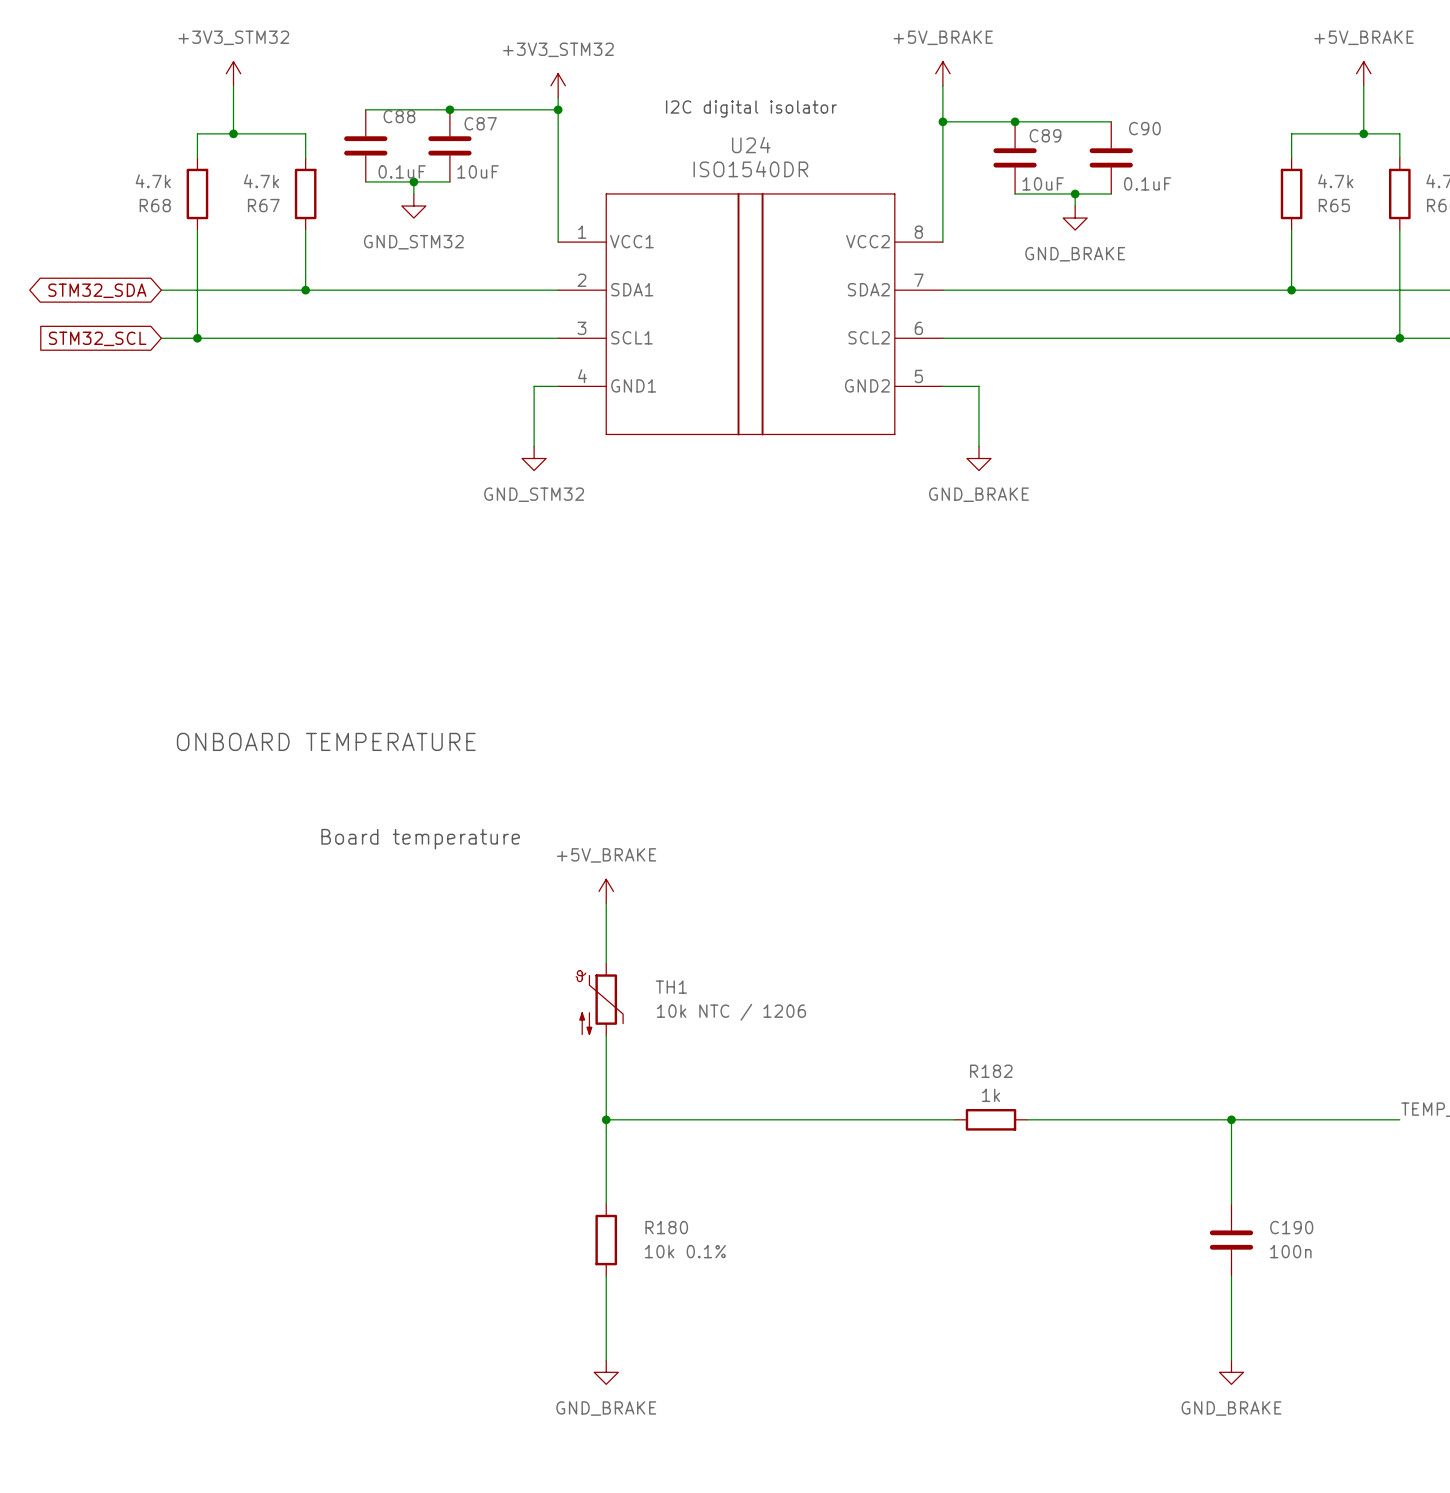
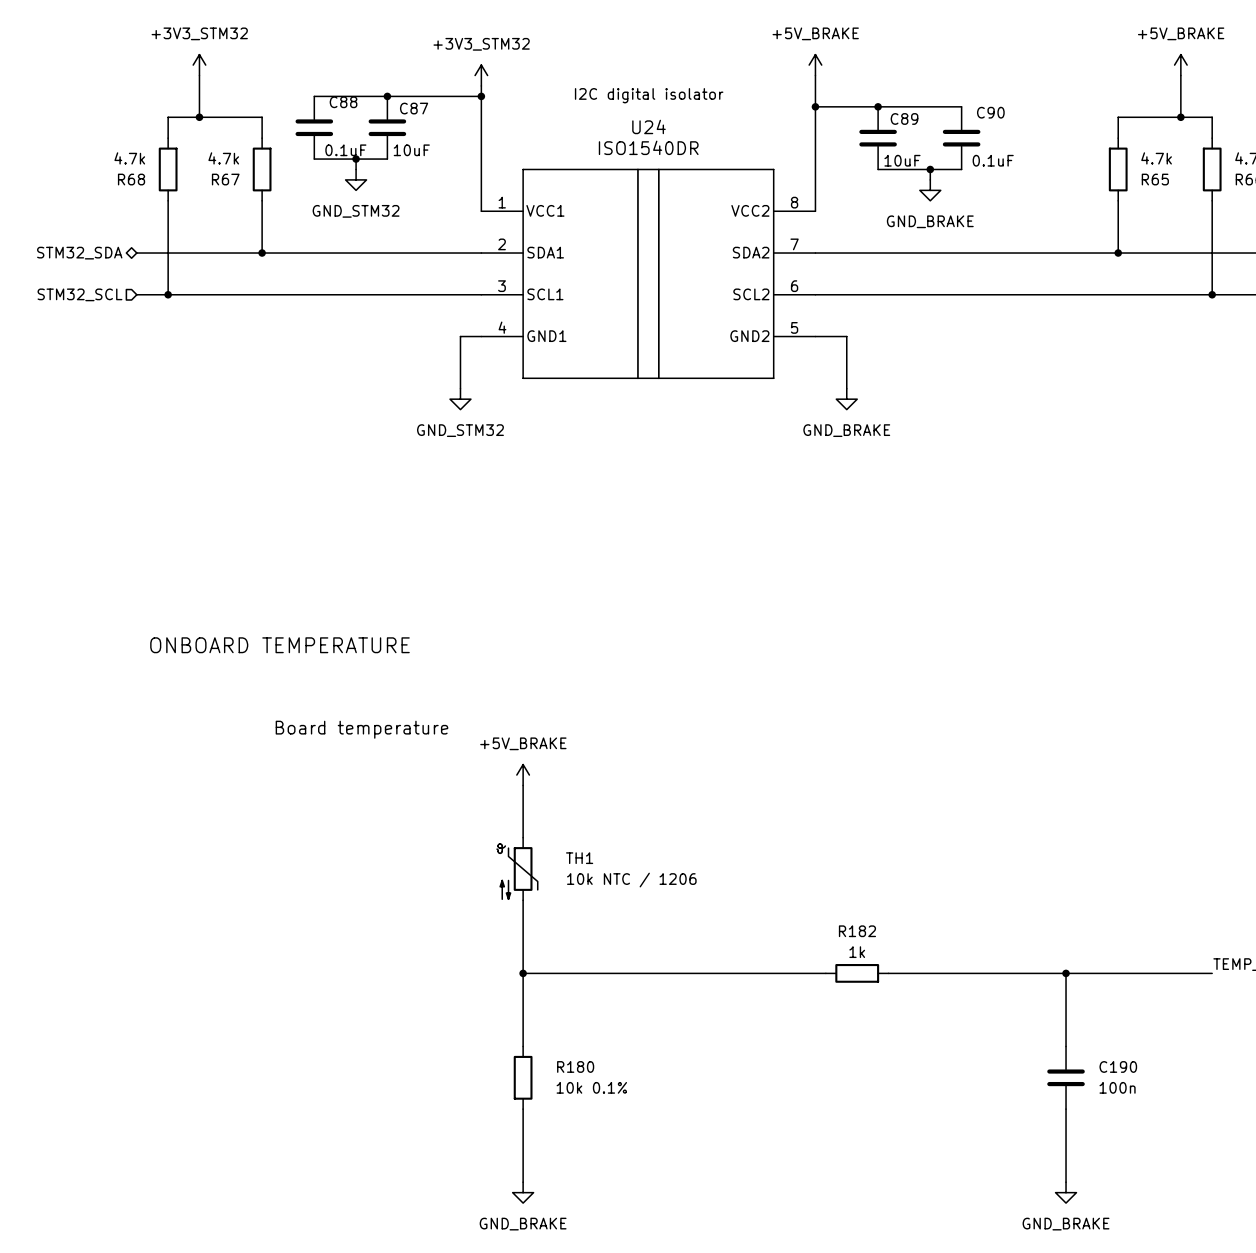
hierarchical label: none -> STM32_SDA (79, 253)
global label: STM32_SDA (97, 290) -> none
hierarchical label: none -> STM32_SCL (79, 294)
global label: STM32_SCL (97, 338) -> none

